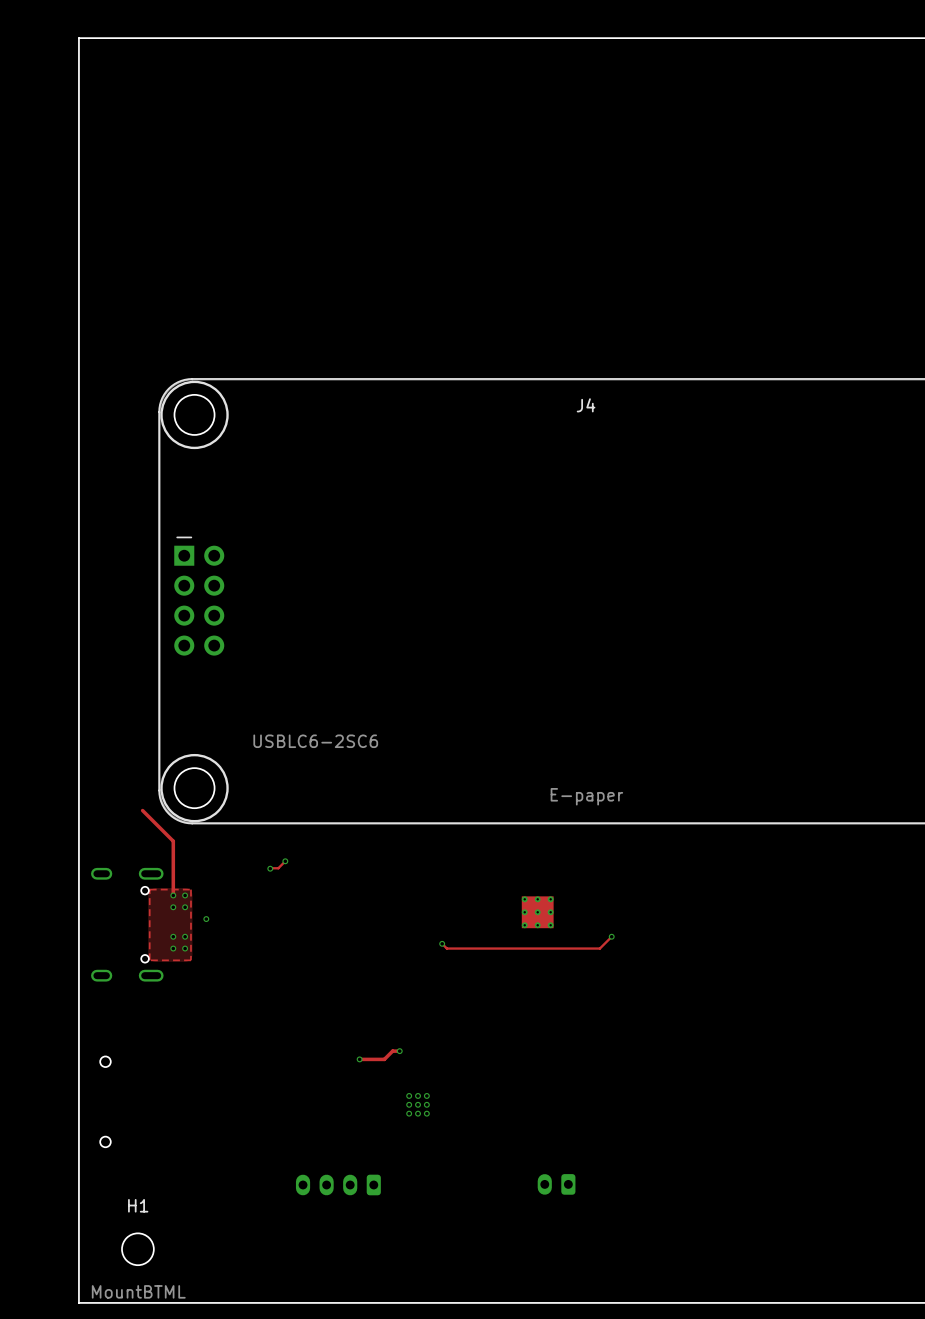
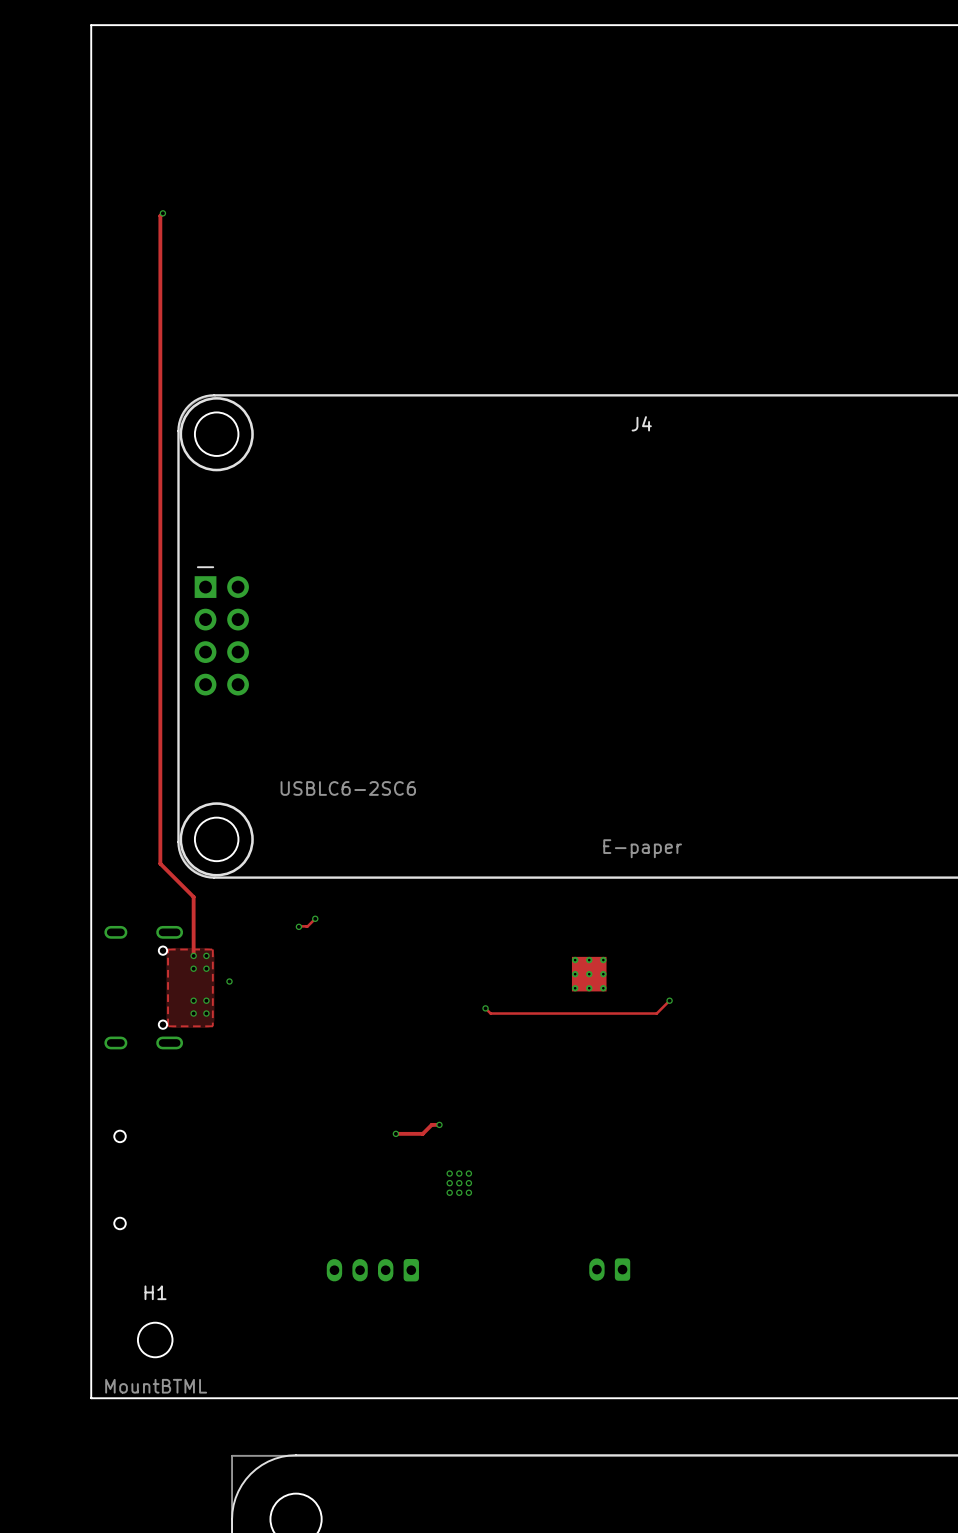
track: none -> (162, 213) (160, 215) (160, 863)
via: none -> (162, 213)

